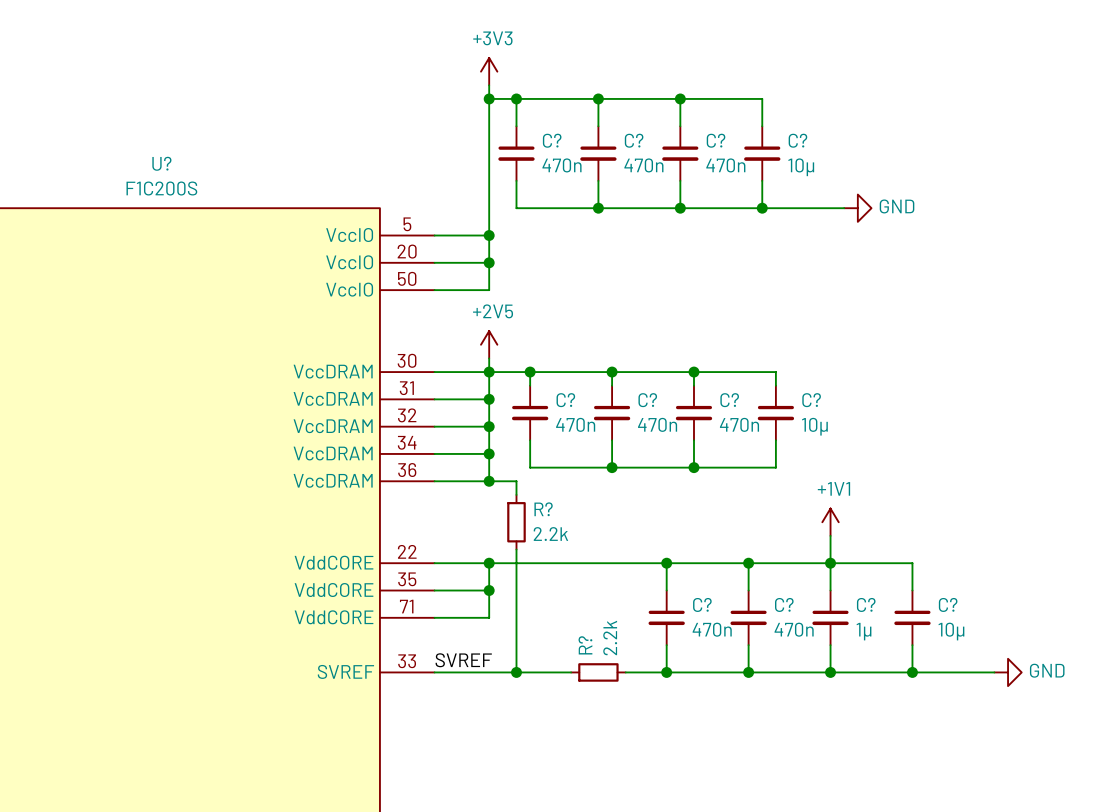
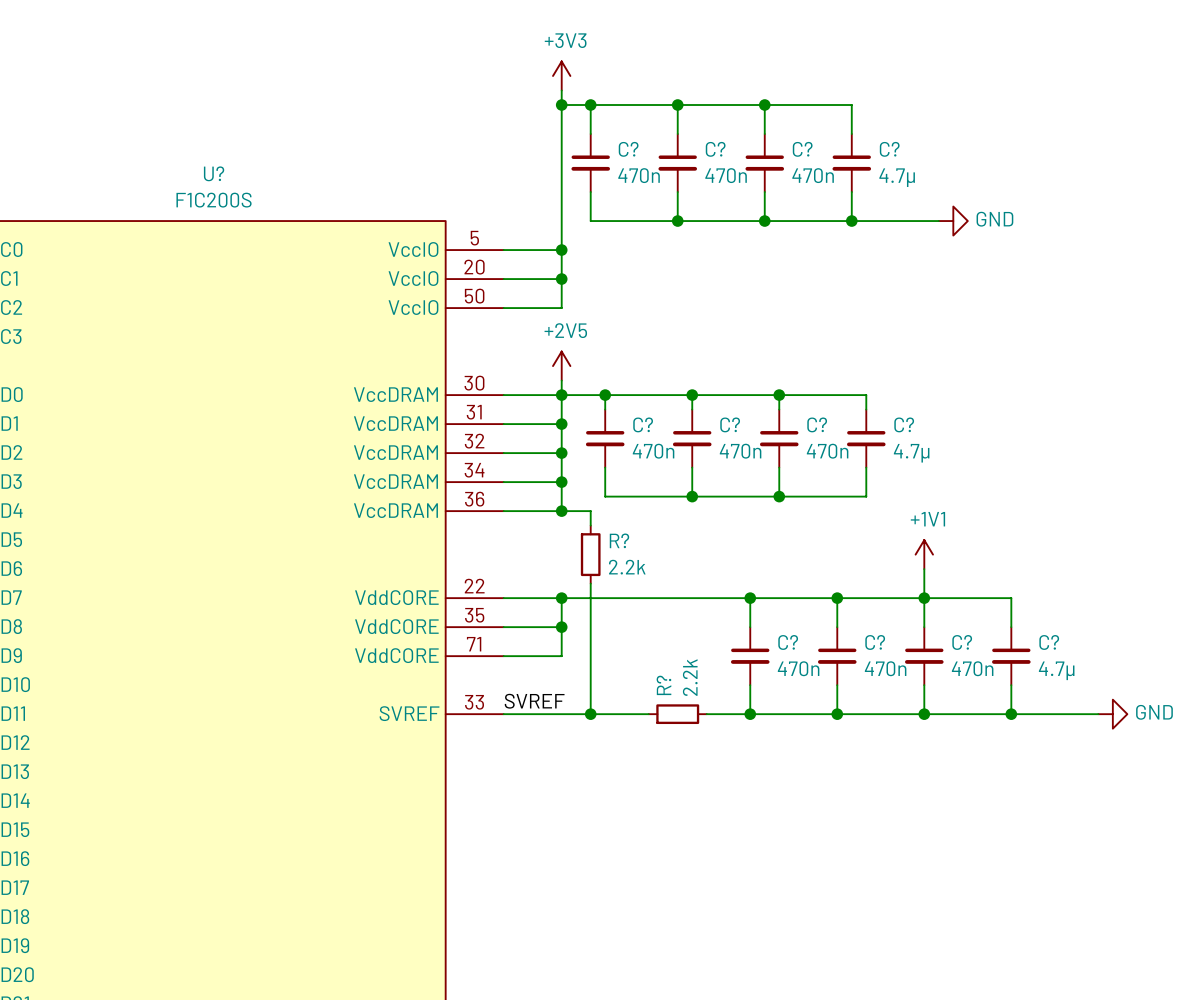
C? value: 10µ (801, 167) -> 4.7µ (897, 177)
C? value: 10µ (814, 426) -> 4.7µ (911, 453)
C? value: 1µ (864, 631) -> 470n (972, 668)
C? value: 10µ (951, 631) -> 4.7µ (1056, 670)

